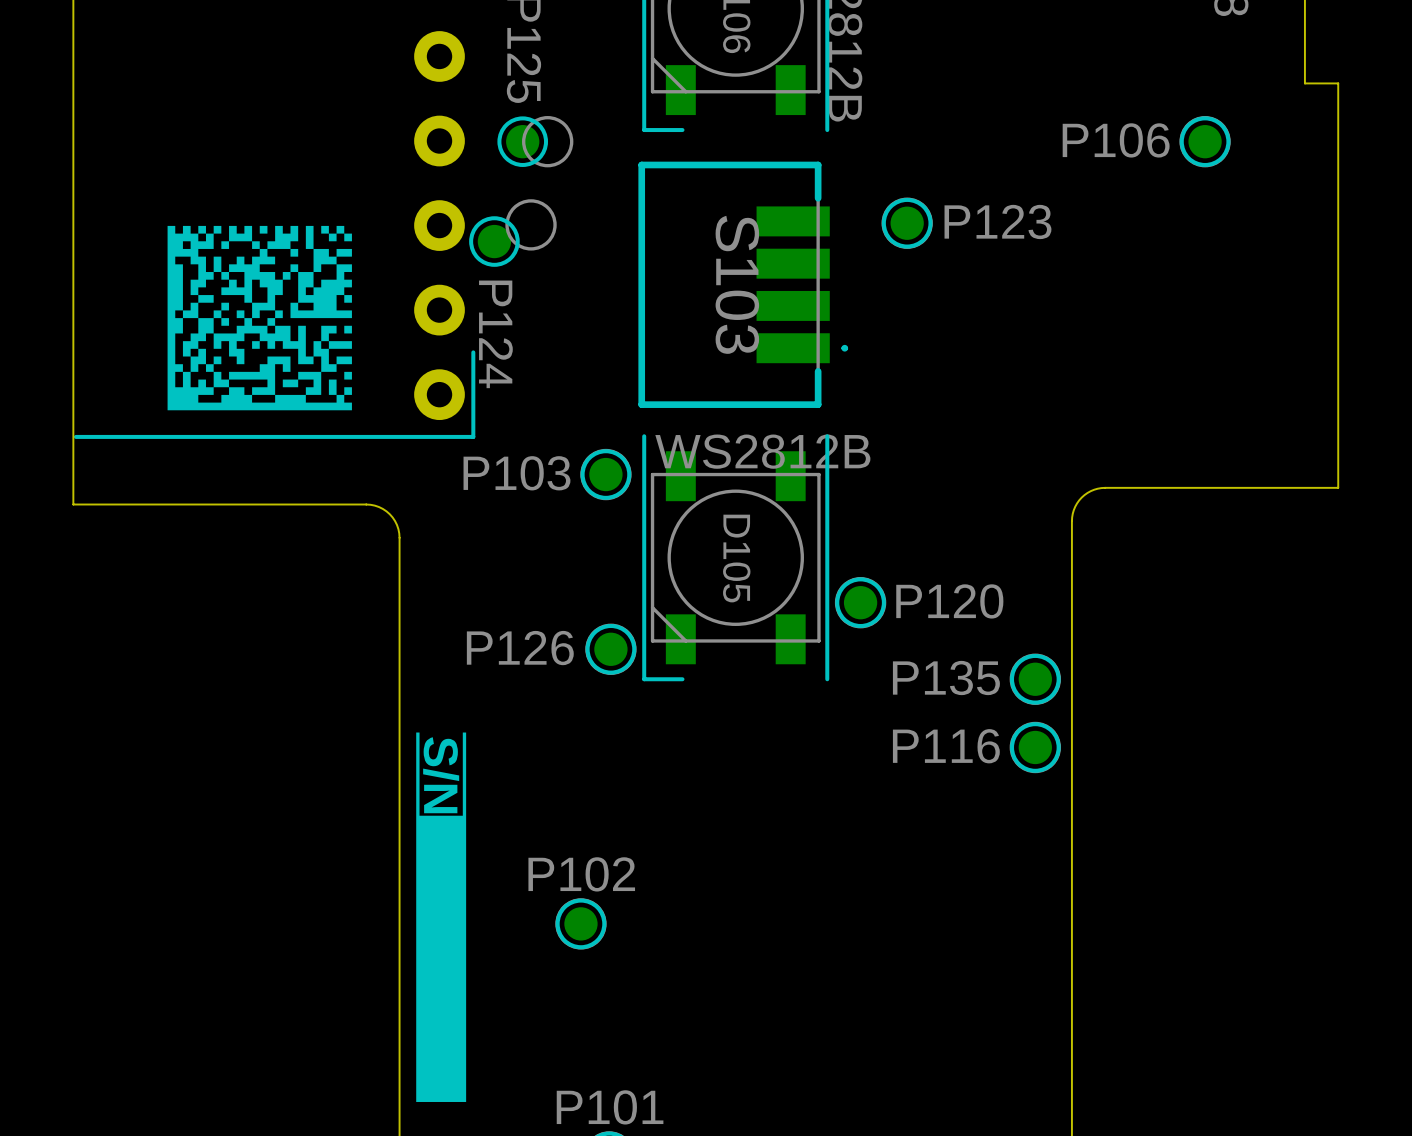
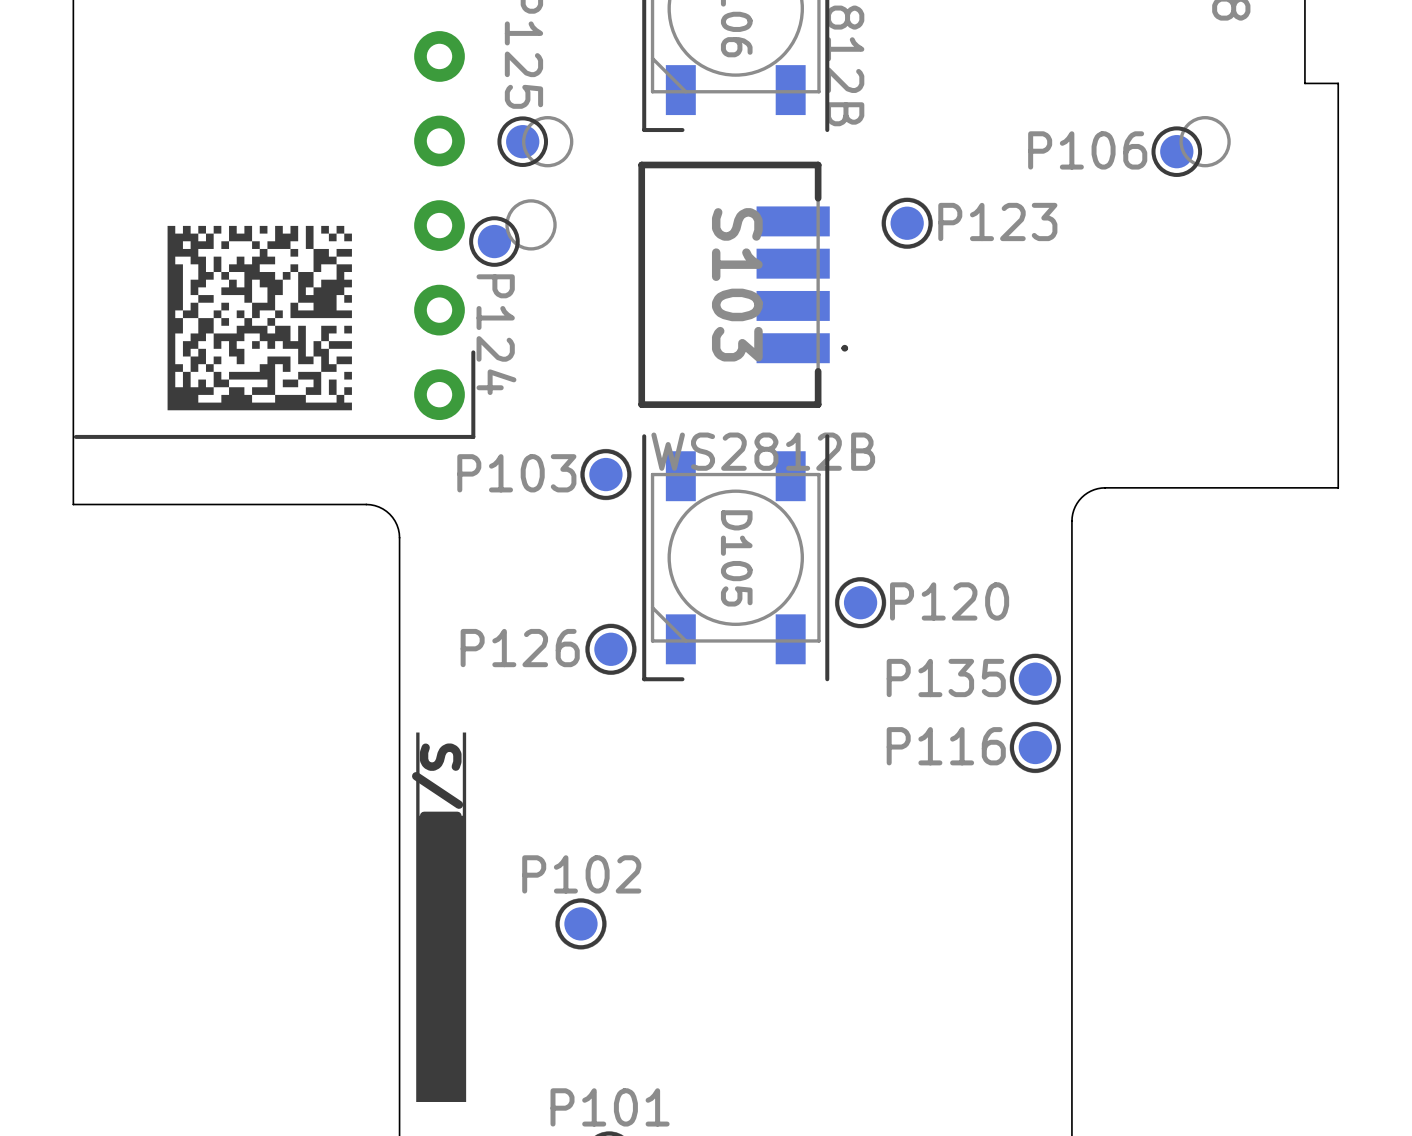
P106 position: (1205, 141) -> (1176, 151)

